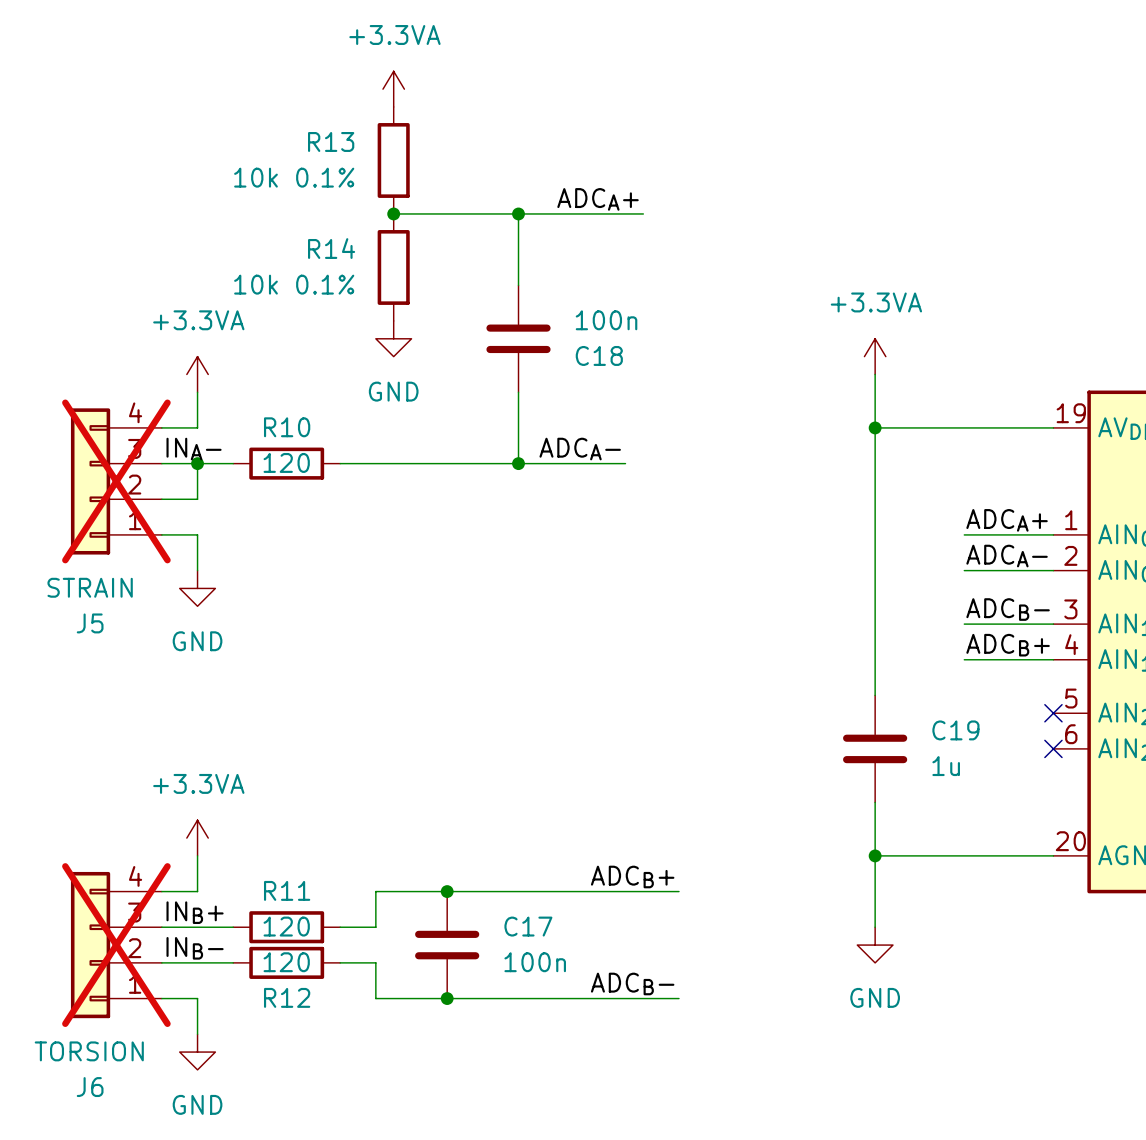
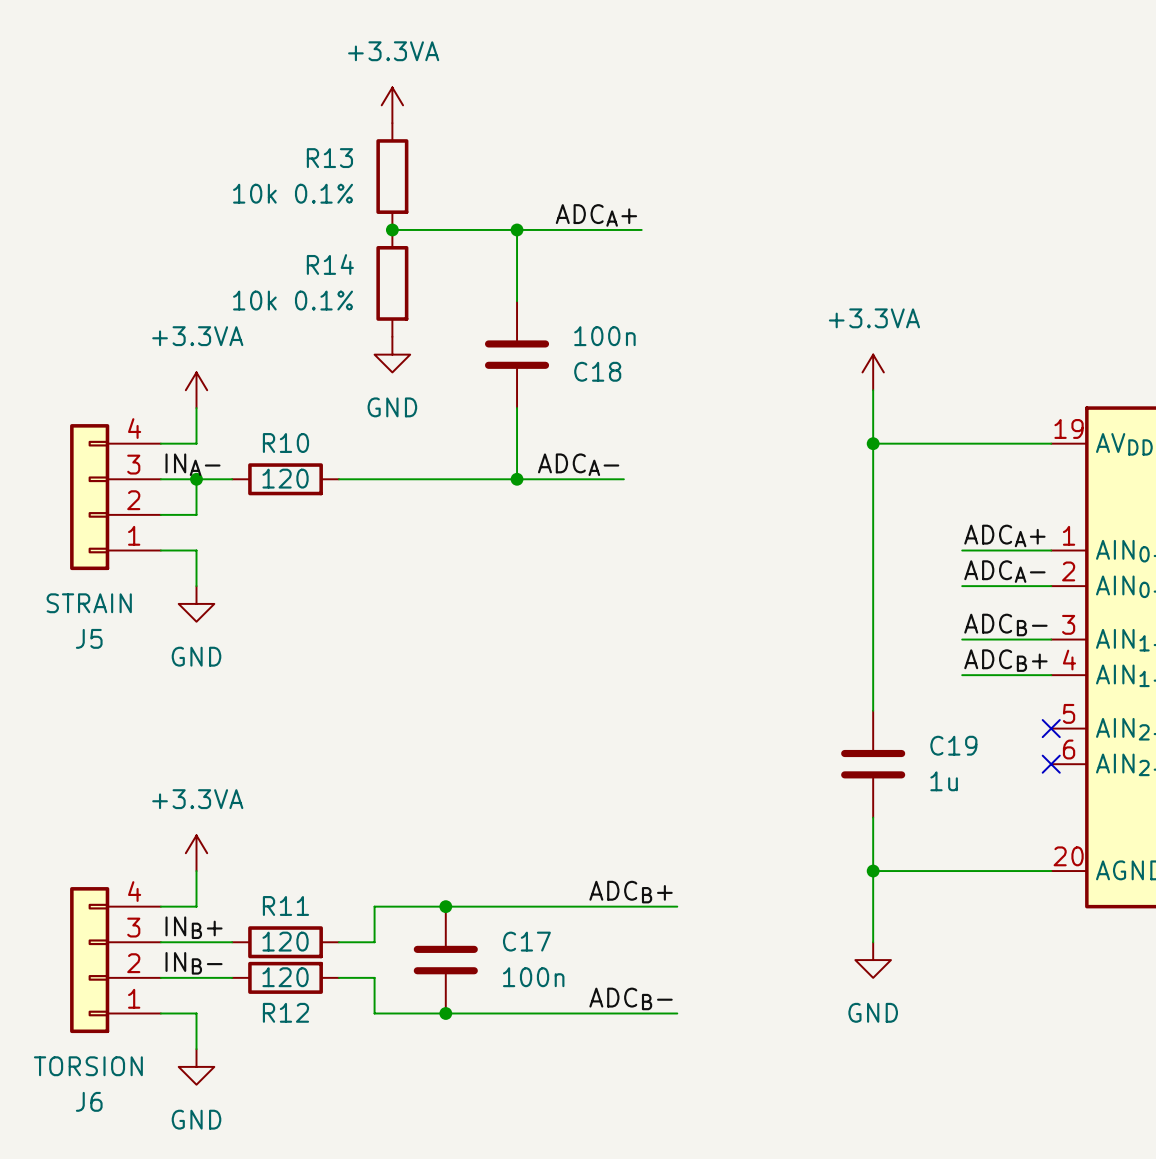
J5 do-not-place cross: (116, 481) -> none
J6 do-not-place cross: (116, 945) -> none

